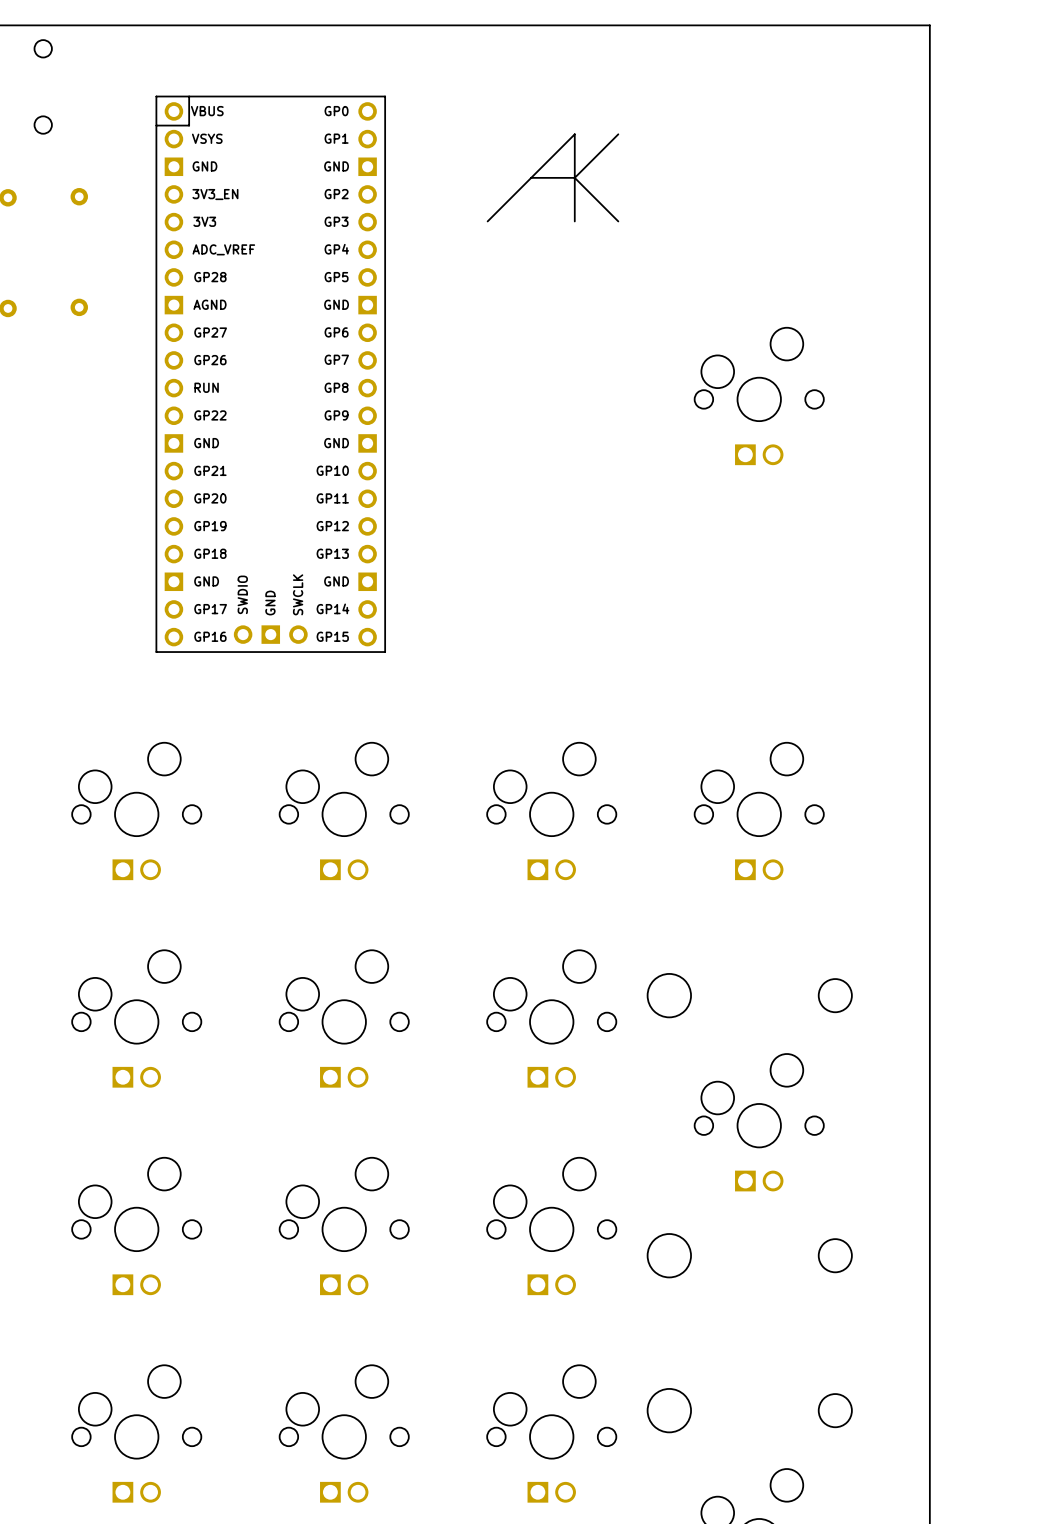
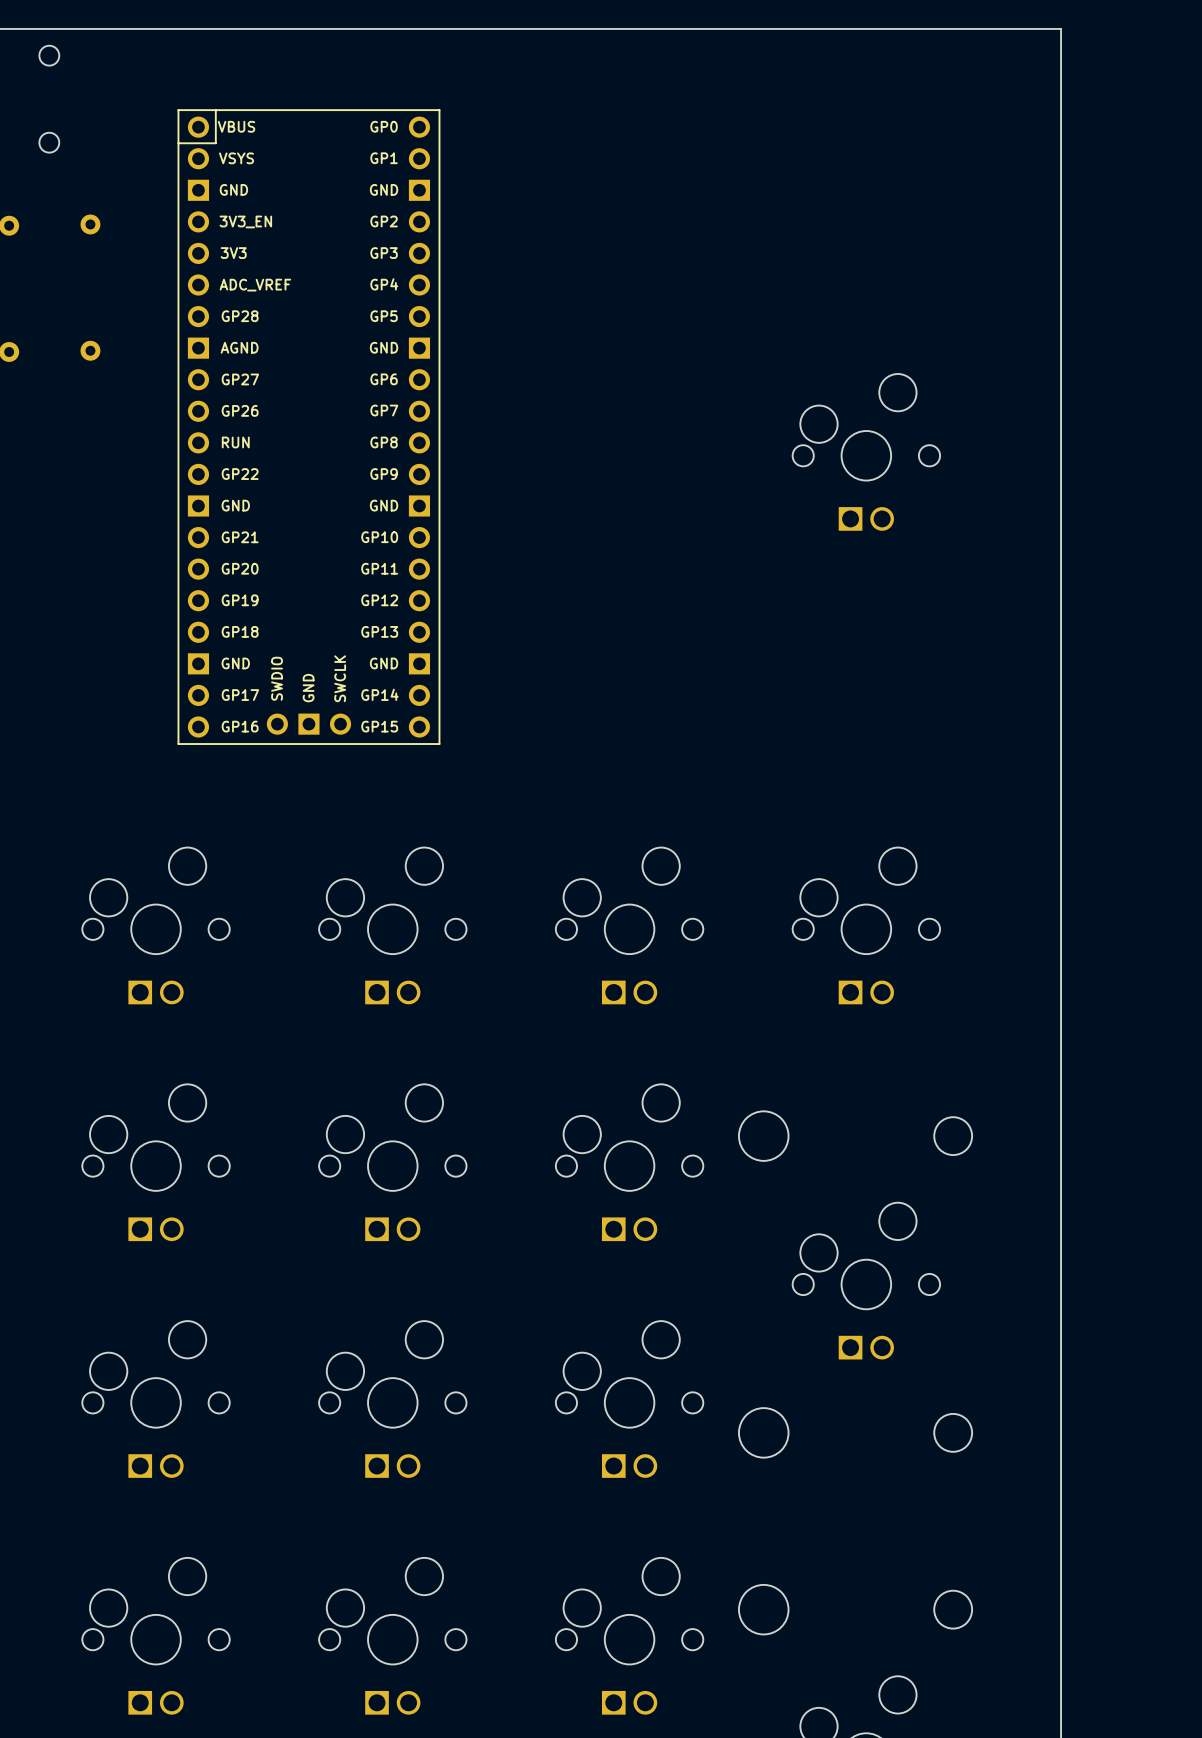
line: (618, 134) (574, 177) -> none
line: (531, 177) (574, 177) -> none
line: (574, 177) (618, 221) -> none
line: (487, 221) (574, 134) (574, 221) -> none

